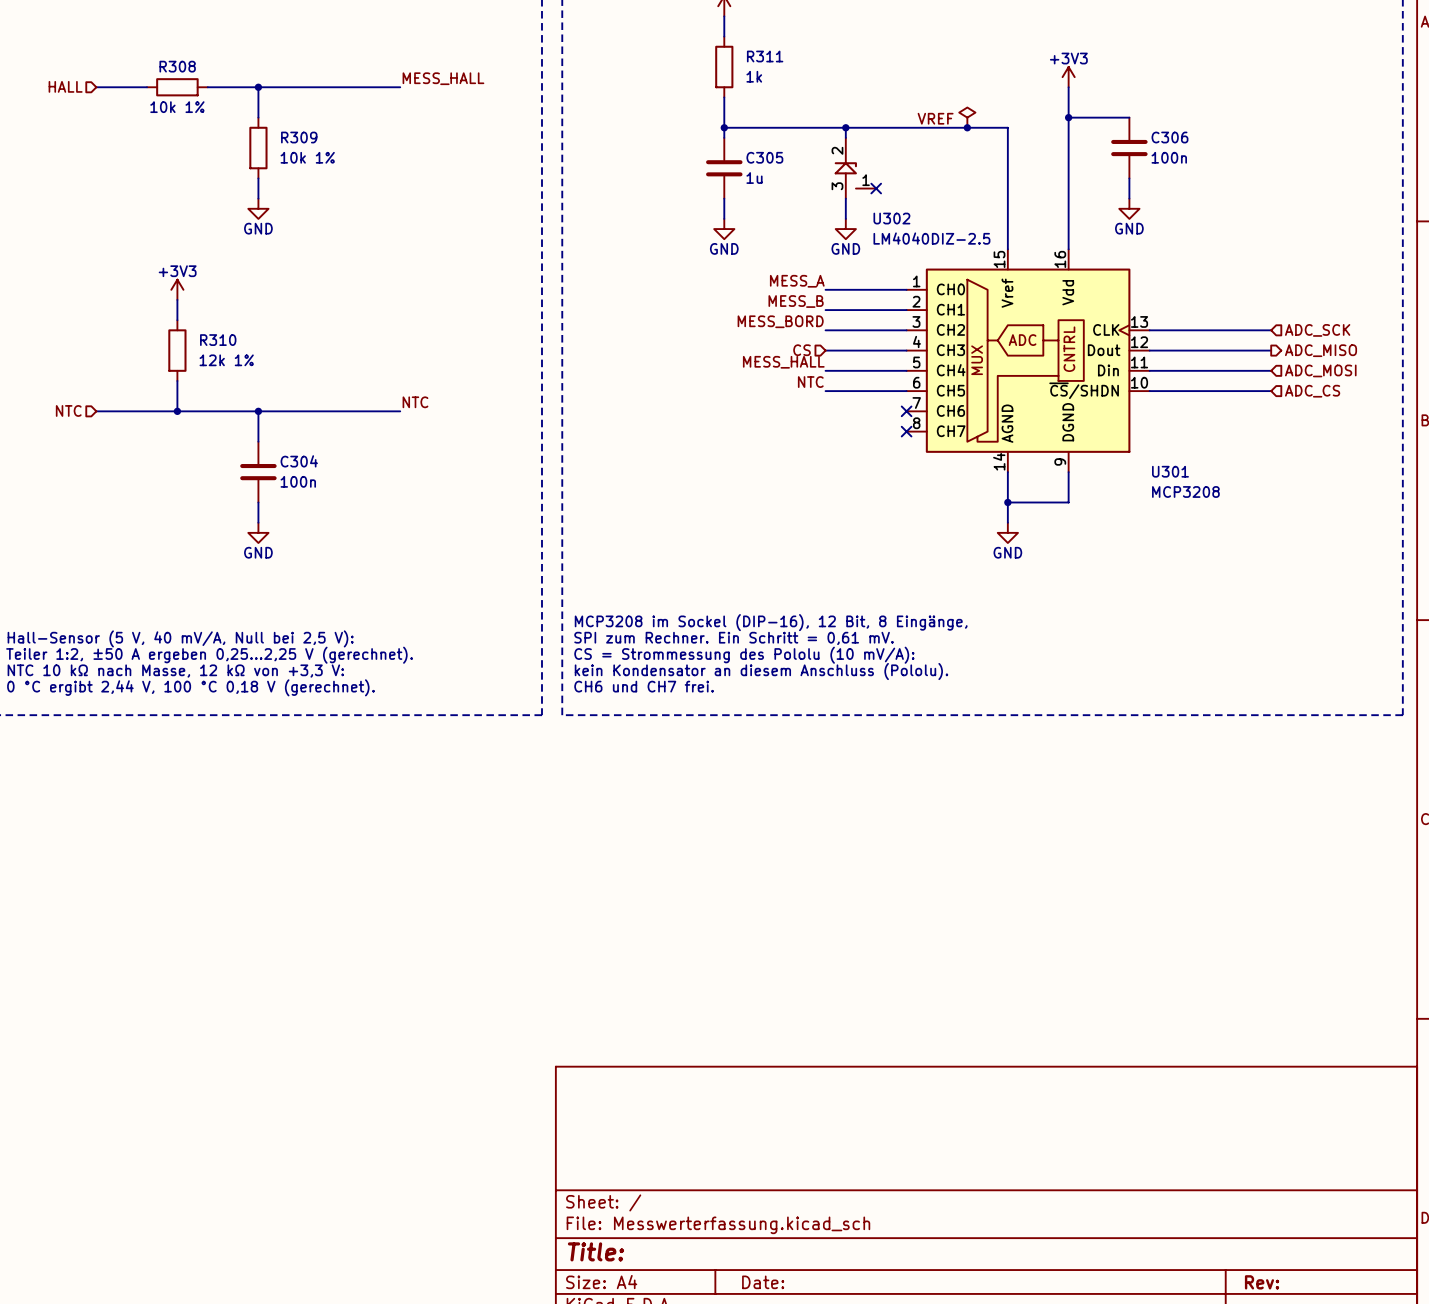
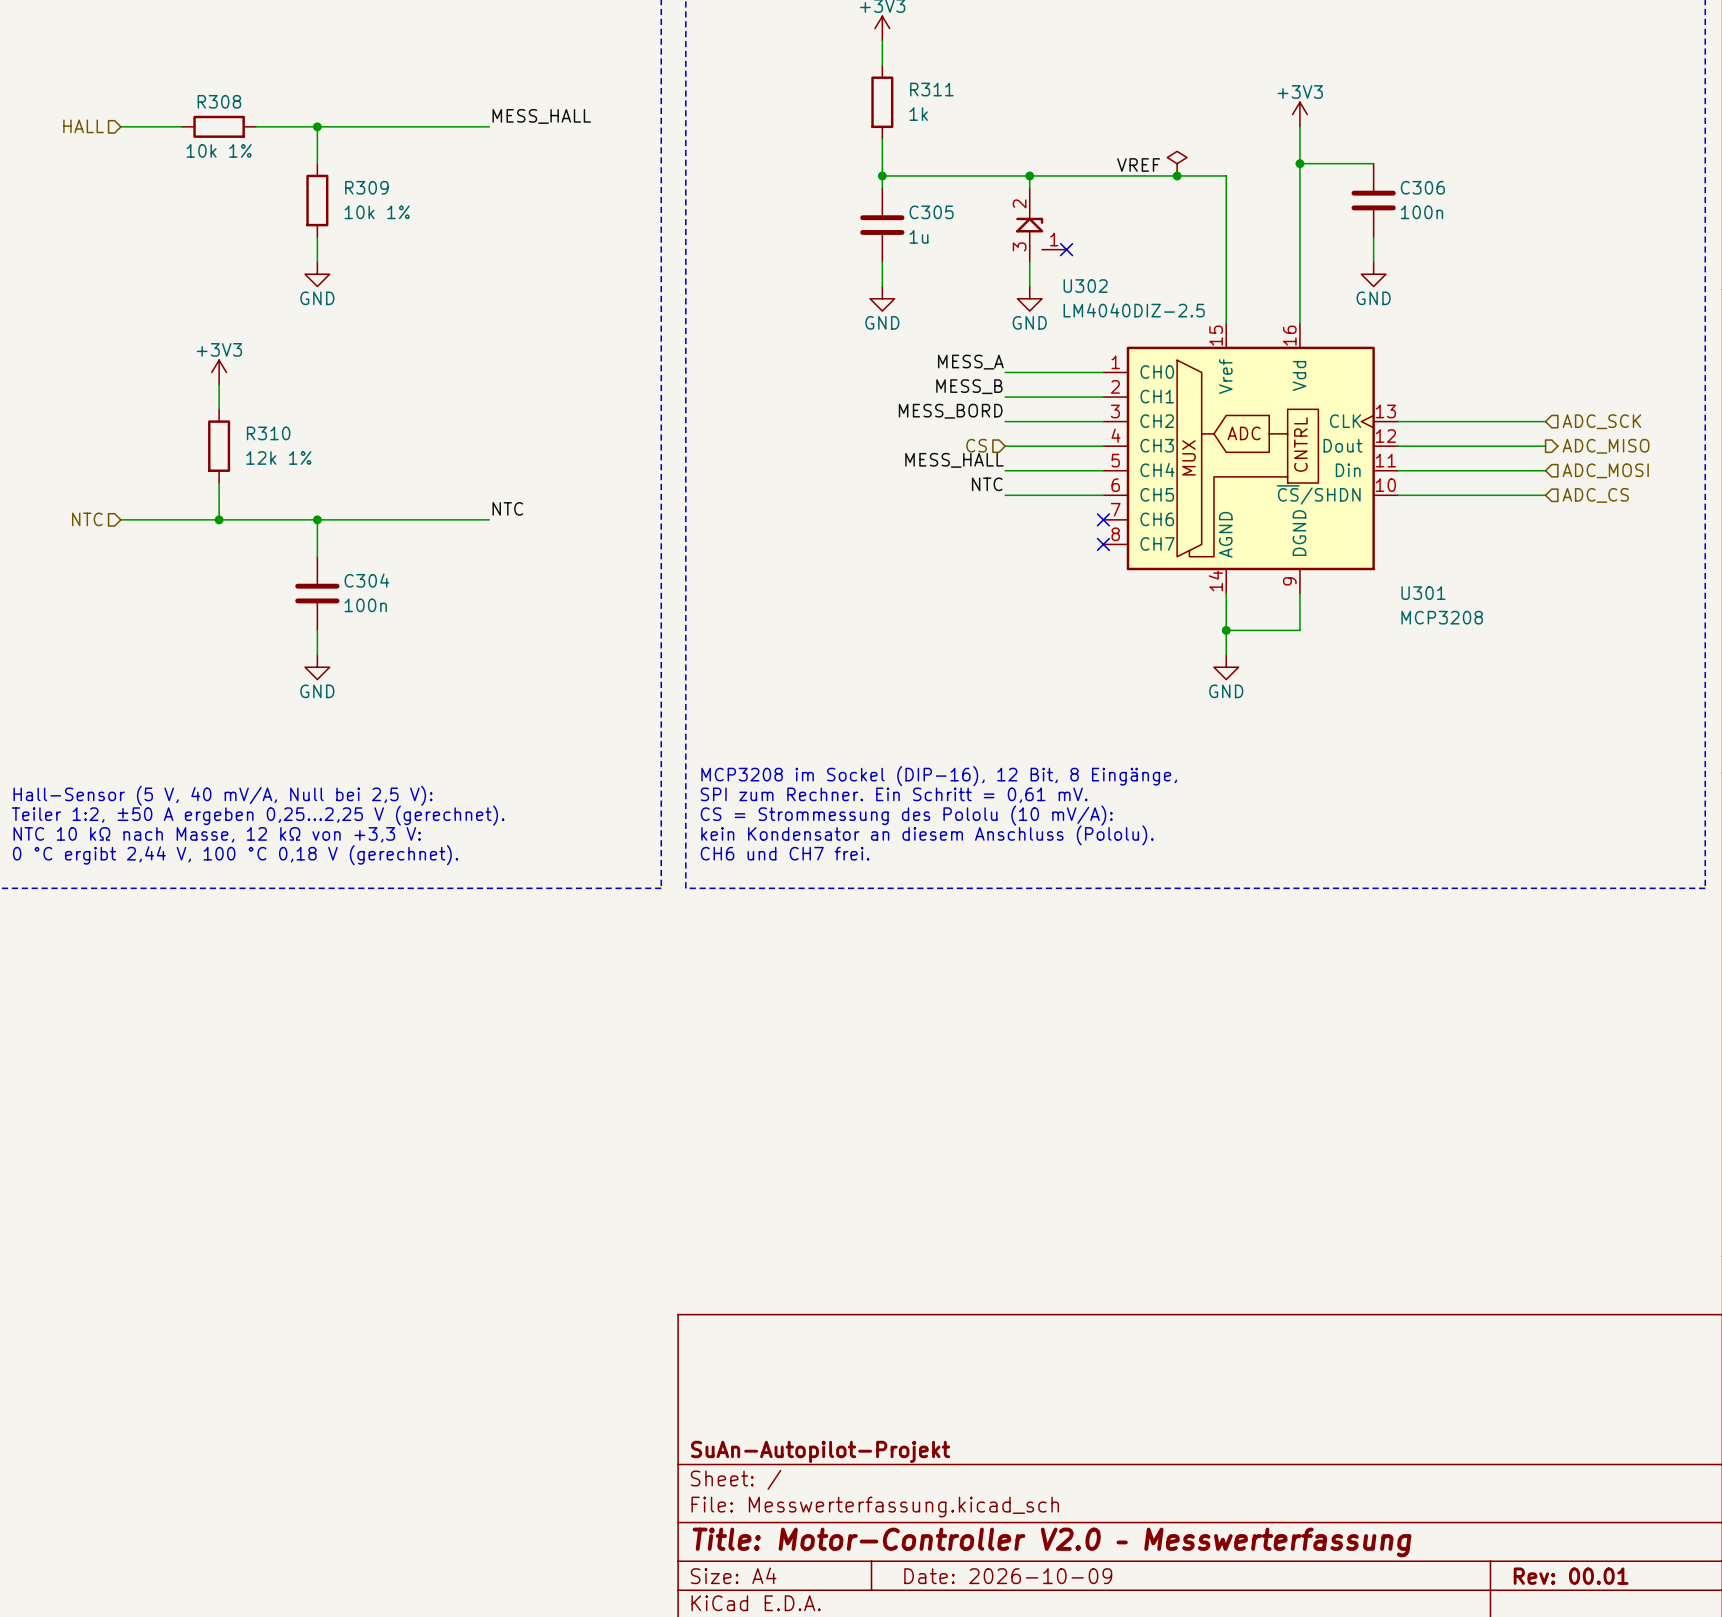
title block: none -> SuAn-Autopilot-Projekt (820, 1451)
title block: Title: (595, 1251) -> Title: Motor-Controller V2.0 – Messwerterfassung (1051, 1542)
title block: Date: (763, 1282) -> Date: 2026-10-09 (1008, 1576)
title block: Rev: (1262, 1282) -> Rev: 00.01 (1571, 1576)

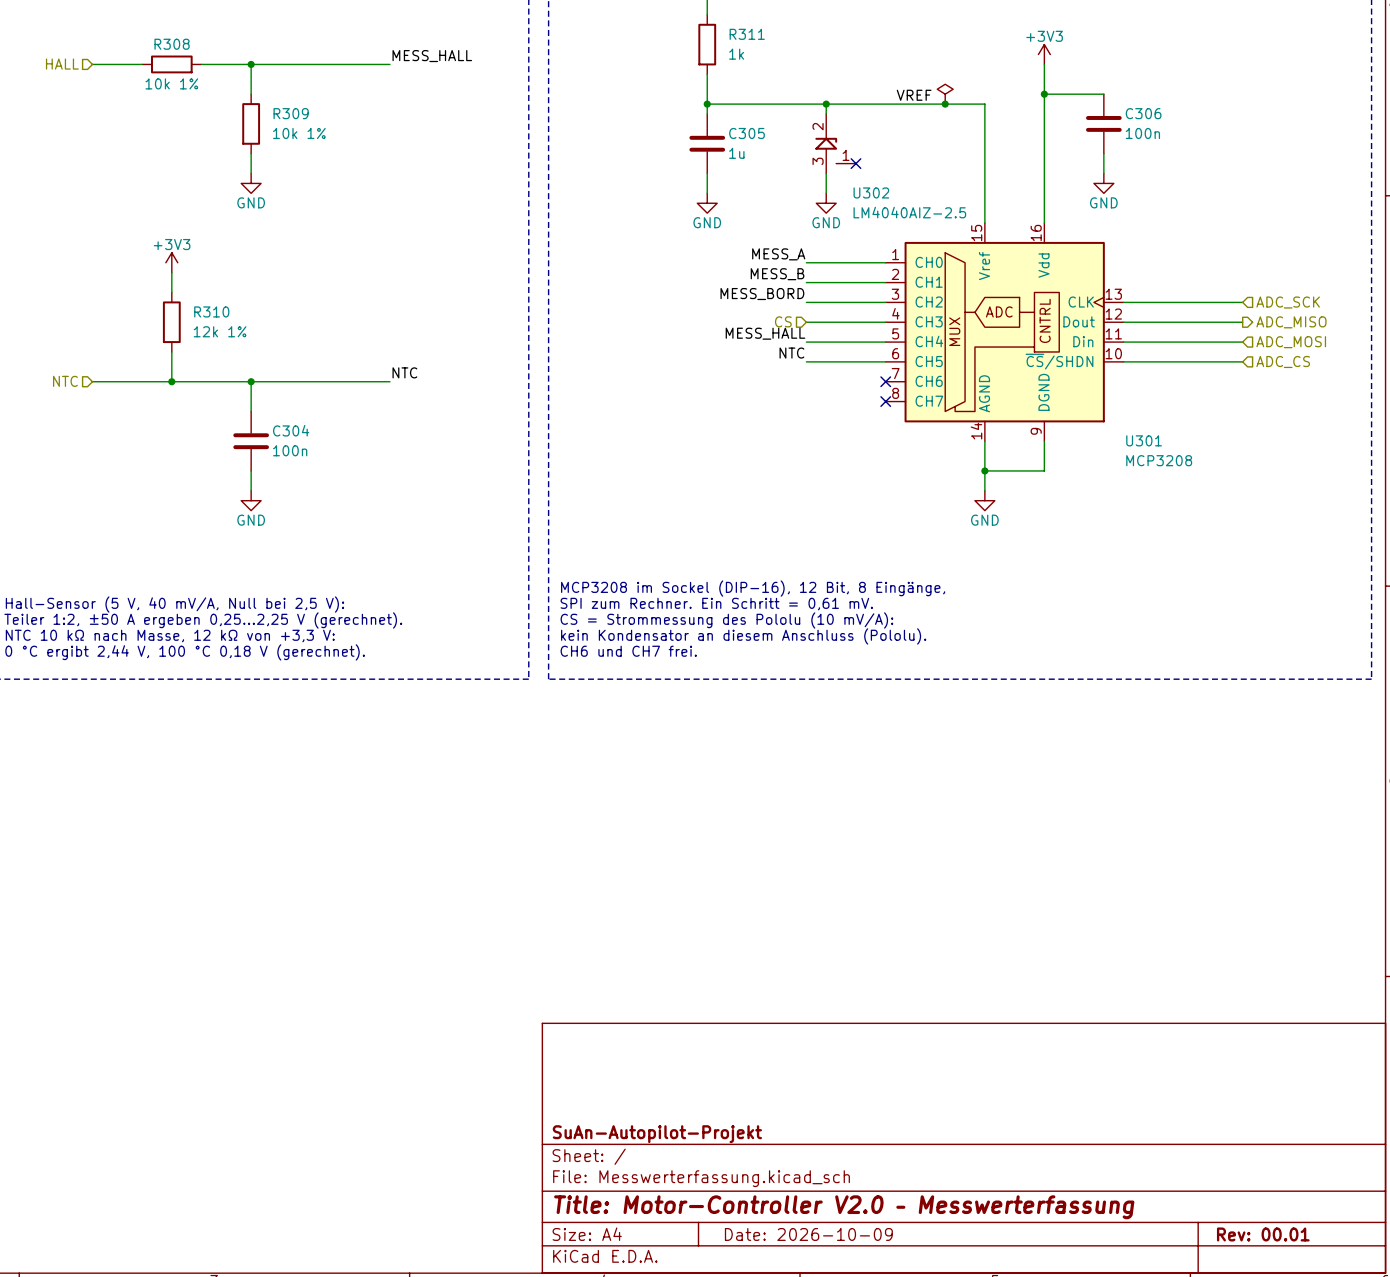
U302 value: LM4040DIZ-2.5 (1134, 310) -> LM4040AIZ-2.5 (909, 212)

